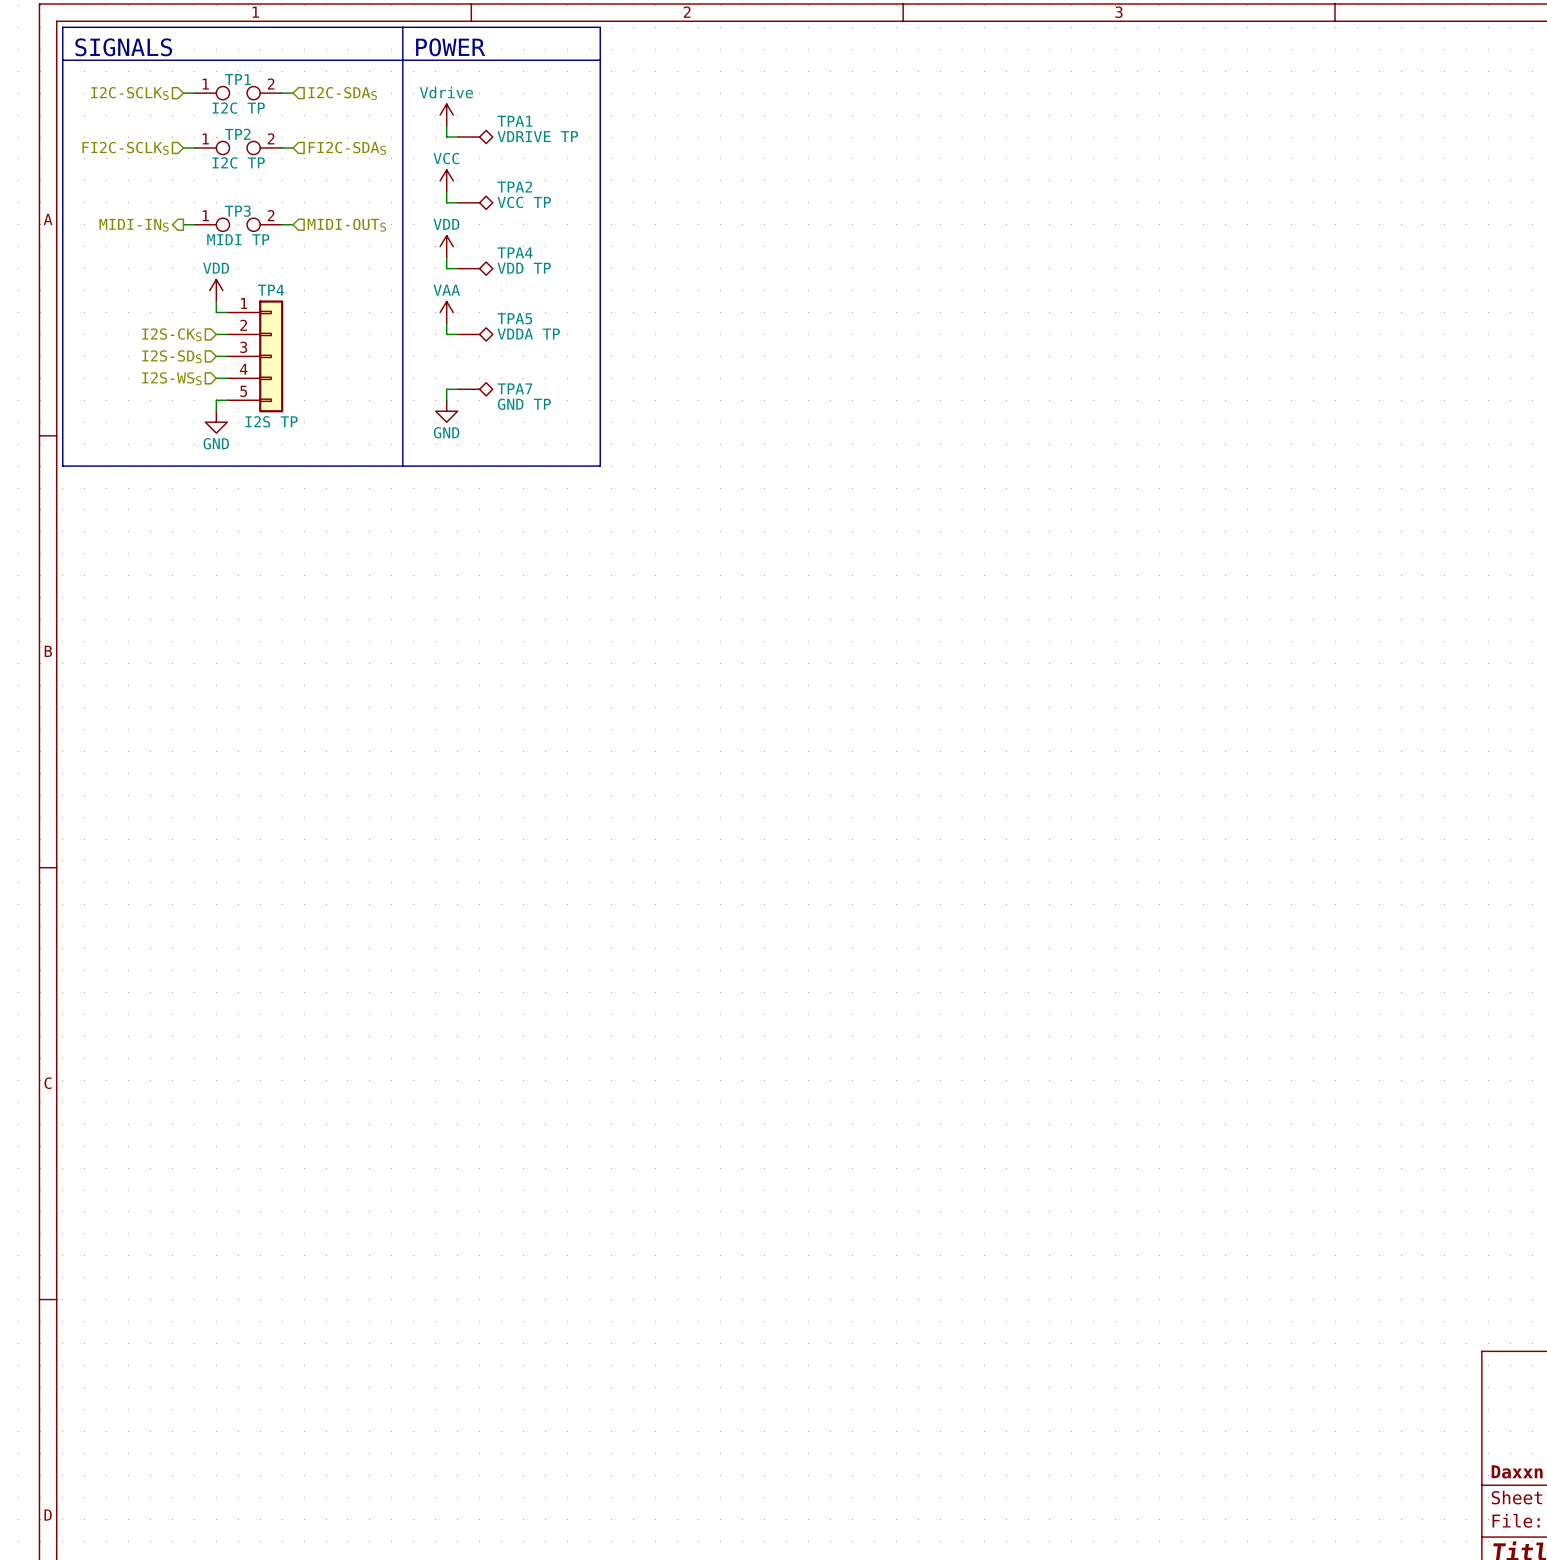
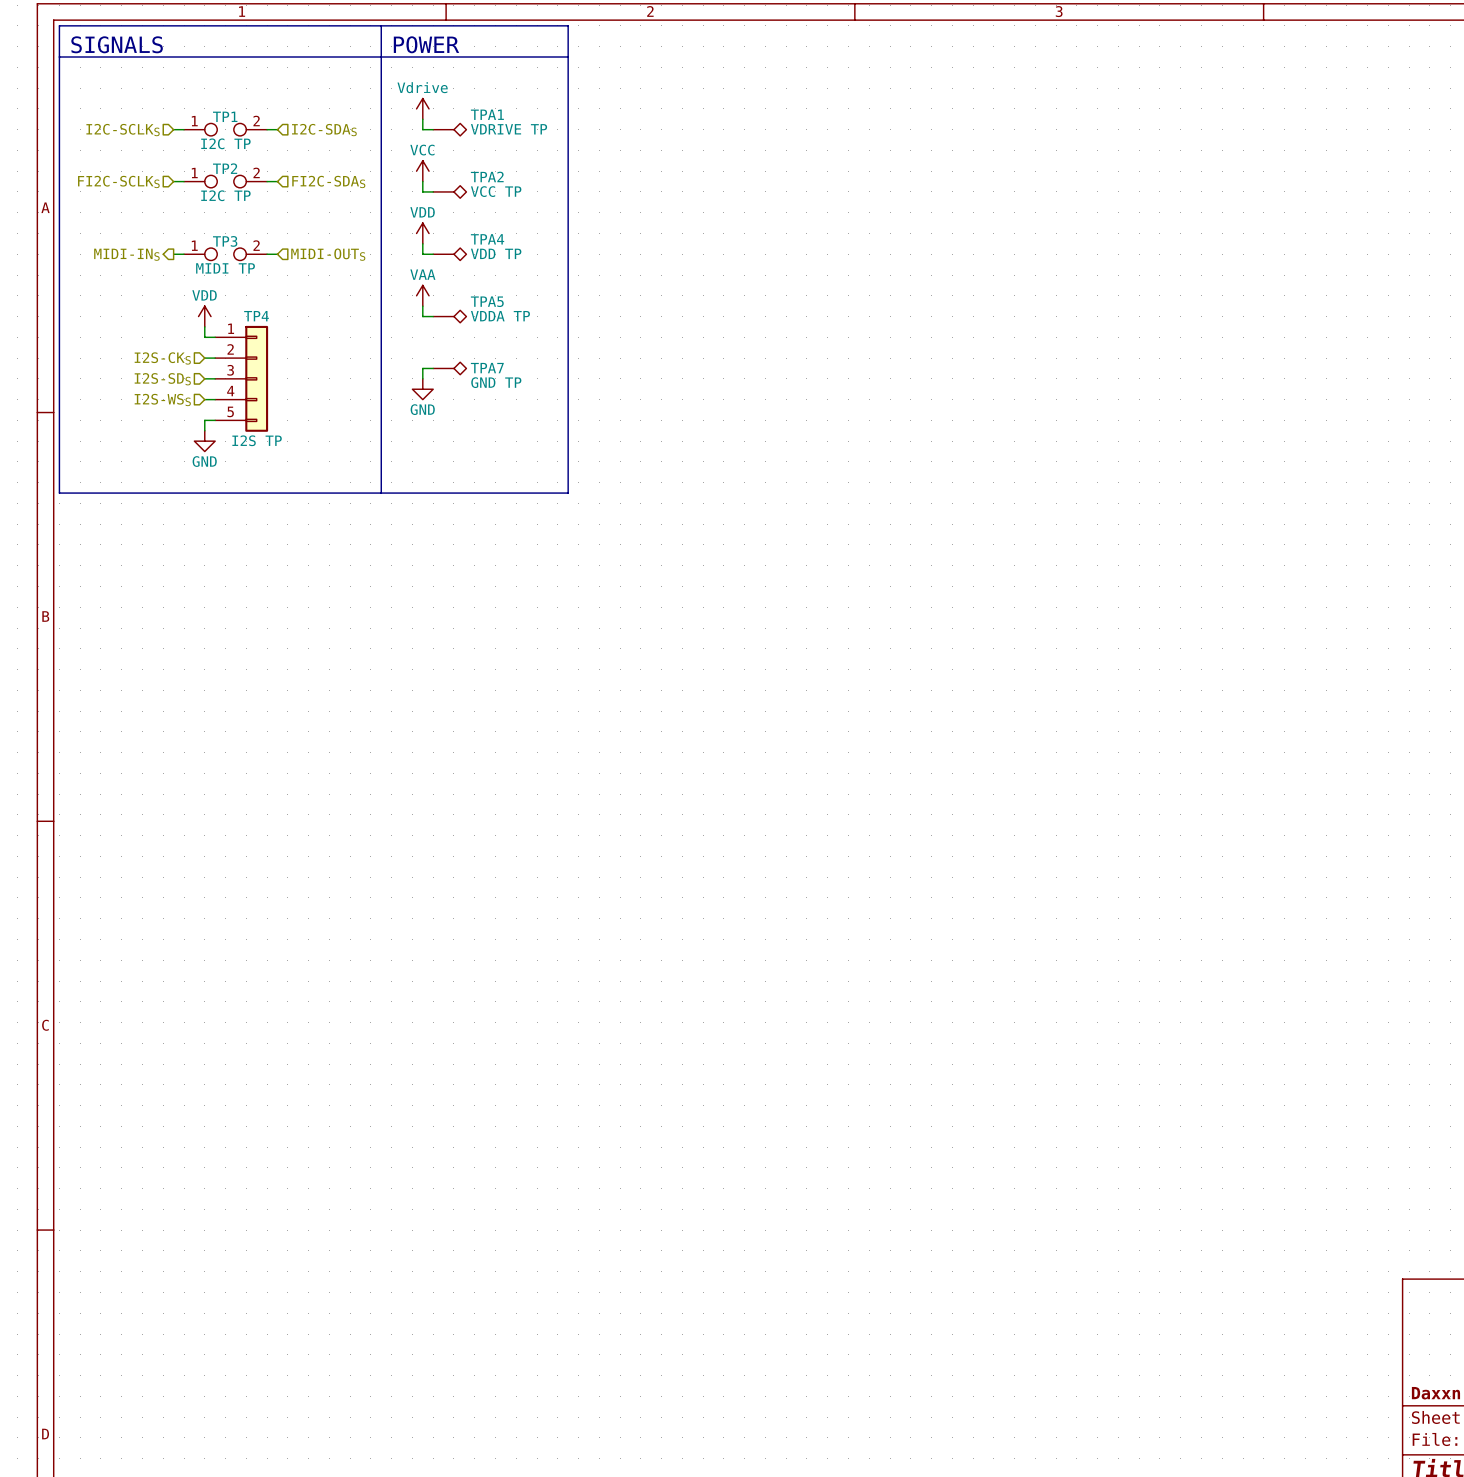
hierarchical label position: I2C-SCLKS (129, 93) -> I2C-SCLKS (123, 130)
wire: (183, 93) (194, 93) -> (173, 129) (184, 129)
TP1 position: (238, 93) -> (225, 129)
wire: (282, 93) (293, 93) -> (267, 129) (277, 129)
hierarchical label position: I2C-SDAS (342, 93) -> I2C-SDAS (324, 130)
wire: (183, 147) (194, 147) -> (173, 181) (184, 181)
TP2 position: (238, 147) -> (225, 181)
wire: (282, 147) (293, 147) -> (267, 181) (277, 181)
hierarchical label position: FI2C-SCLKS (125, 148) -> FI2C-SCLKS (118, 181)
hierarchical label position: FI2C-SDAS (347, 148) -> FI2C-SDAS (328, 181)
wire: (183, 224) (194, 224) -> (173, 254) (184, 254)
TP3 position: (238, 224) -> (225, 254)
wire: (282, 224) (293, 224) -> (267, 254) (277, 254)
hierarchical label position: MIDI-INS (134, 225) -> MIDI-INS (126, 254)
hierarchical label position: MIDI-OUTS (346, 225) -> MIDI-OUTS (328, 254)
power symbol position: VDD (216, 290) -> VDD (204, 316)
wire: (216, 301) (216, 312) (227, 312) -> none
hierarchical label: I2S-CKS (171, 334) -> none
hierarchical label position: I2S-SDS (171, 356) -> I2S-SDS (162, 379)
TP4 position: (255, 356) -> (241, 378)
hierarchical label: I2S-WSS (171, 378) -> I2S-CKS (162, 358)
wire: (216, 400) (216, 411) -> (204, 326) (204, 337)
hierarchical label: none -> I2S-WSS (162, 399)
power symbol position: GND (216, 422) -> GND (204, 441)
wire: none -> (215, 420) (204, 420) (204, 430)
line: (62, 466) (600, 466) -> (59, 441) (59, 493) (568, 493) (568, 441)
line: none -> (381, 441) (381, 493)

